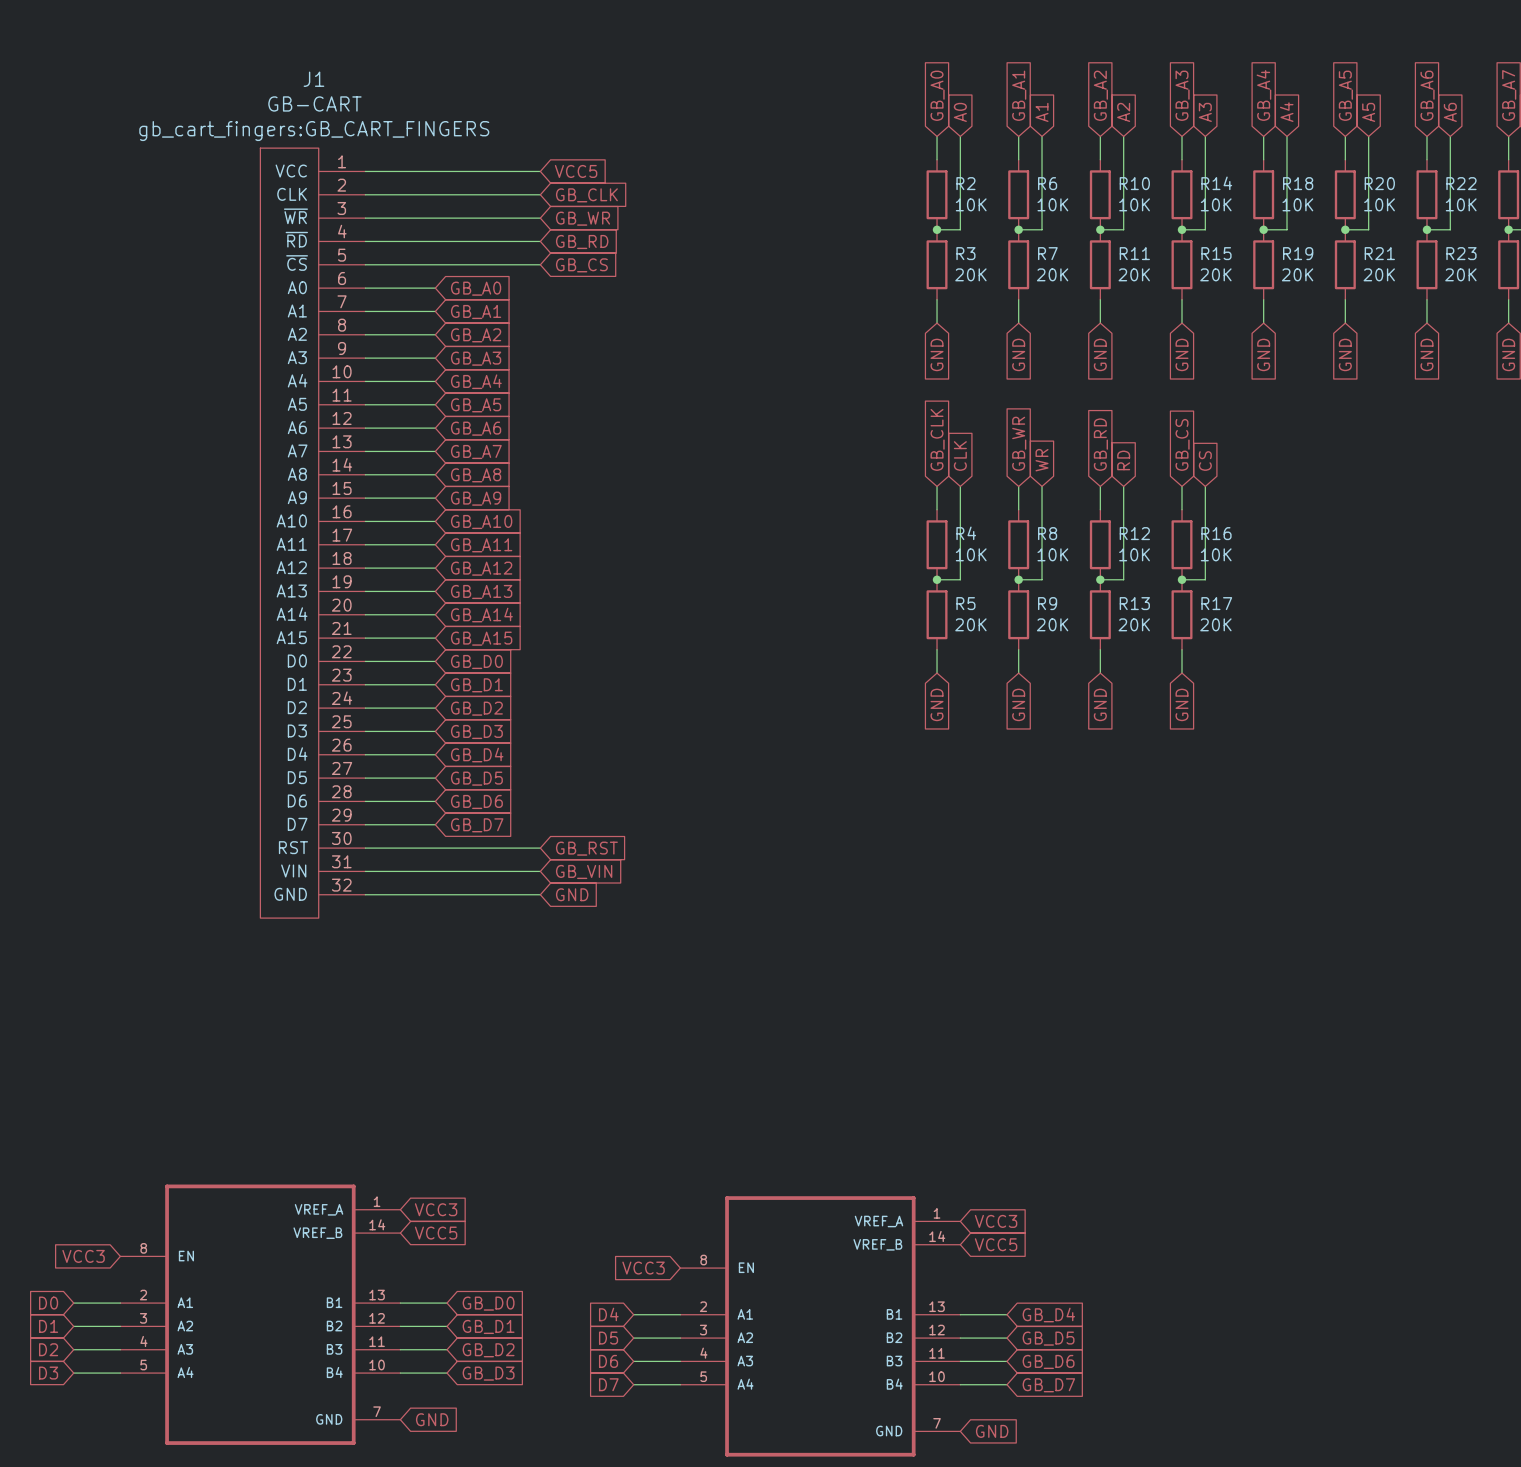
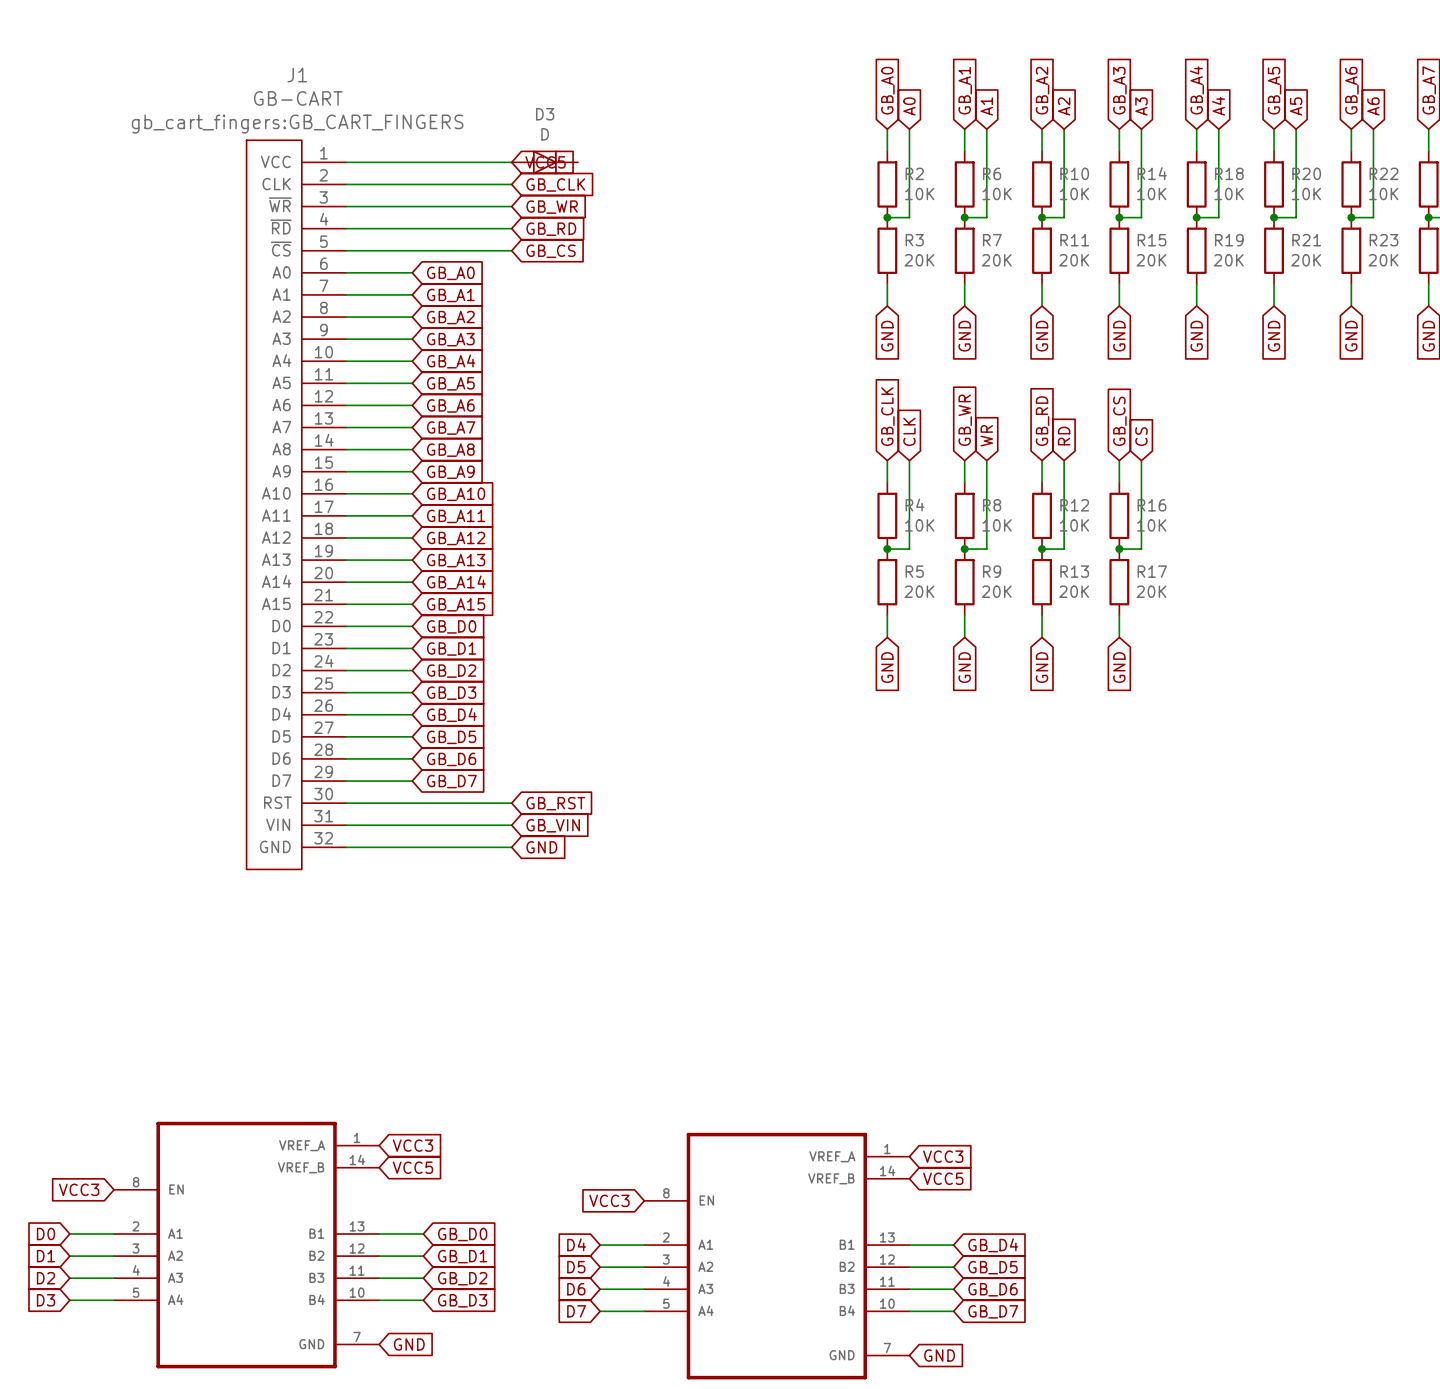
D3: none -> D (544, 162)

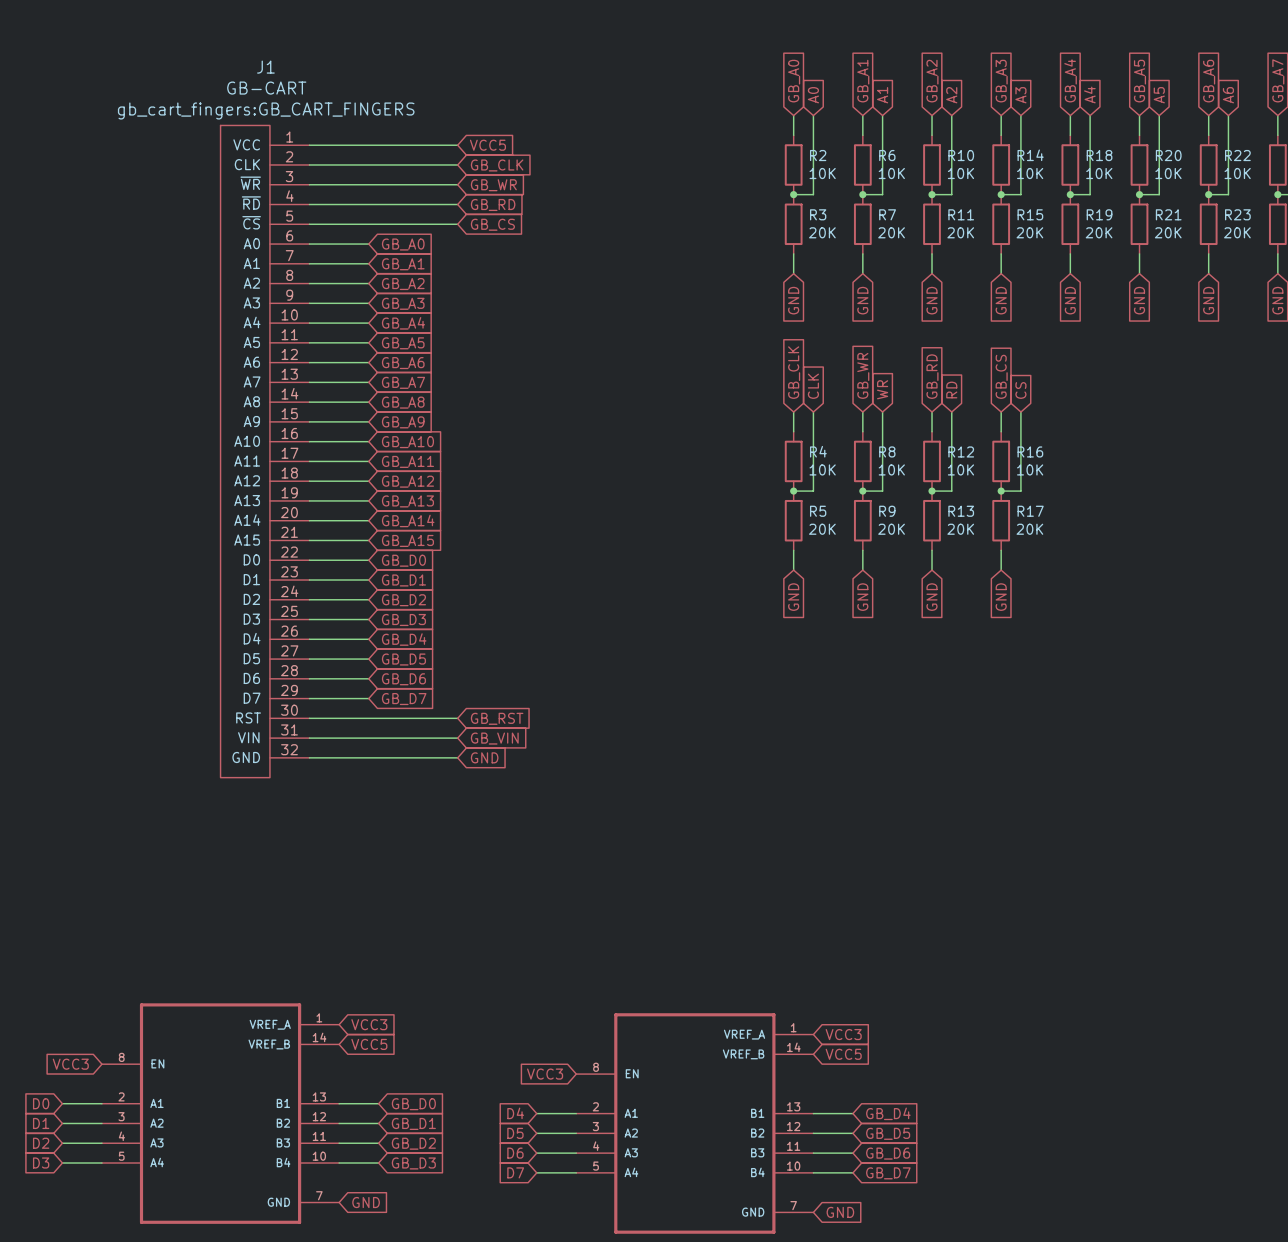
D3: D (544, 162) -> none

